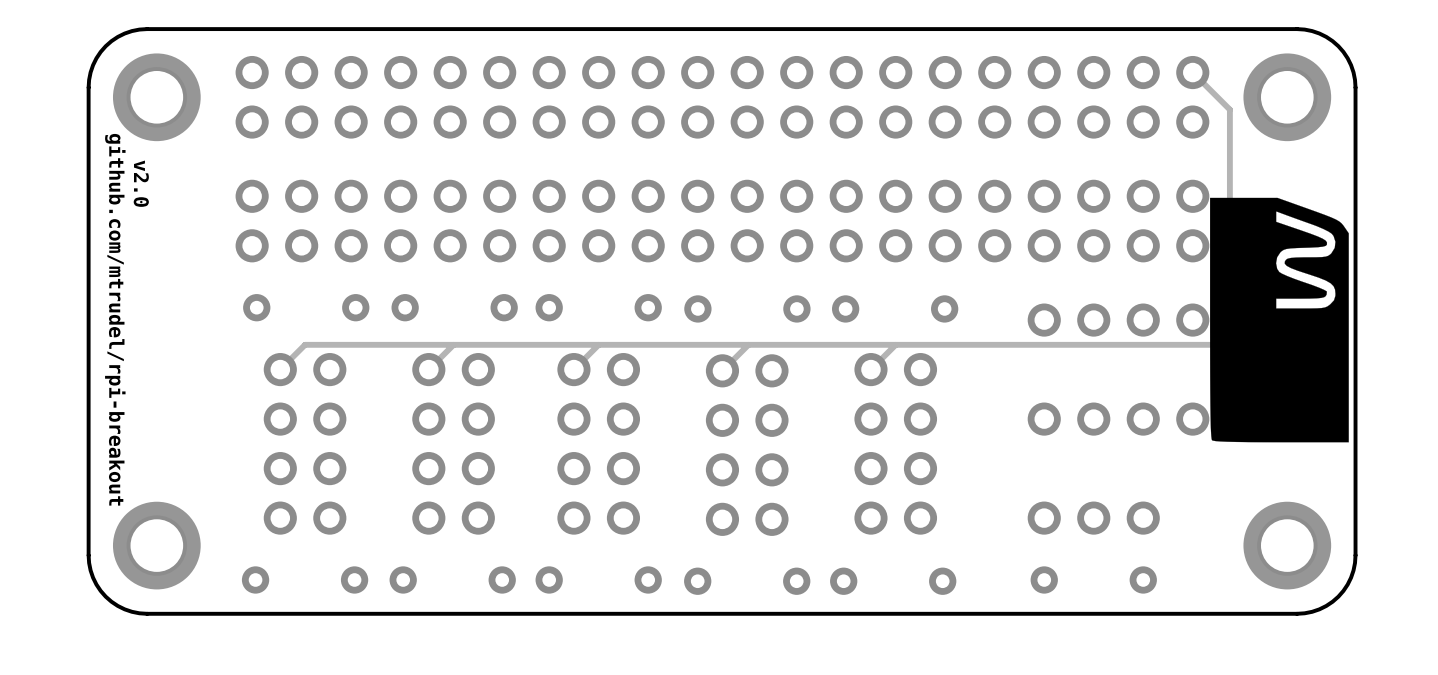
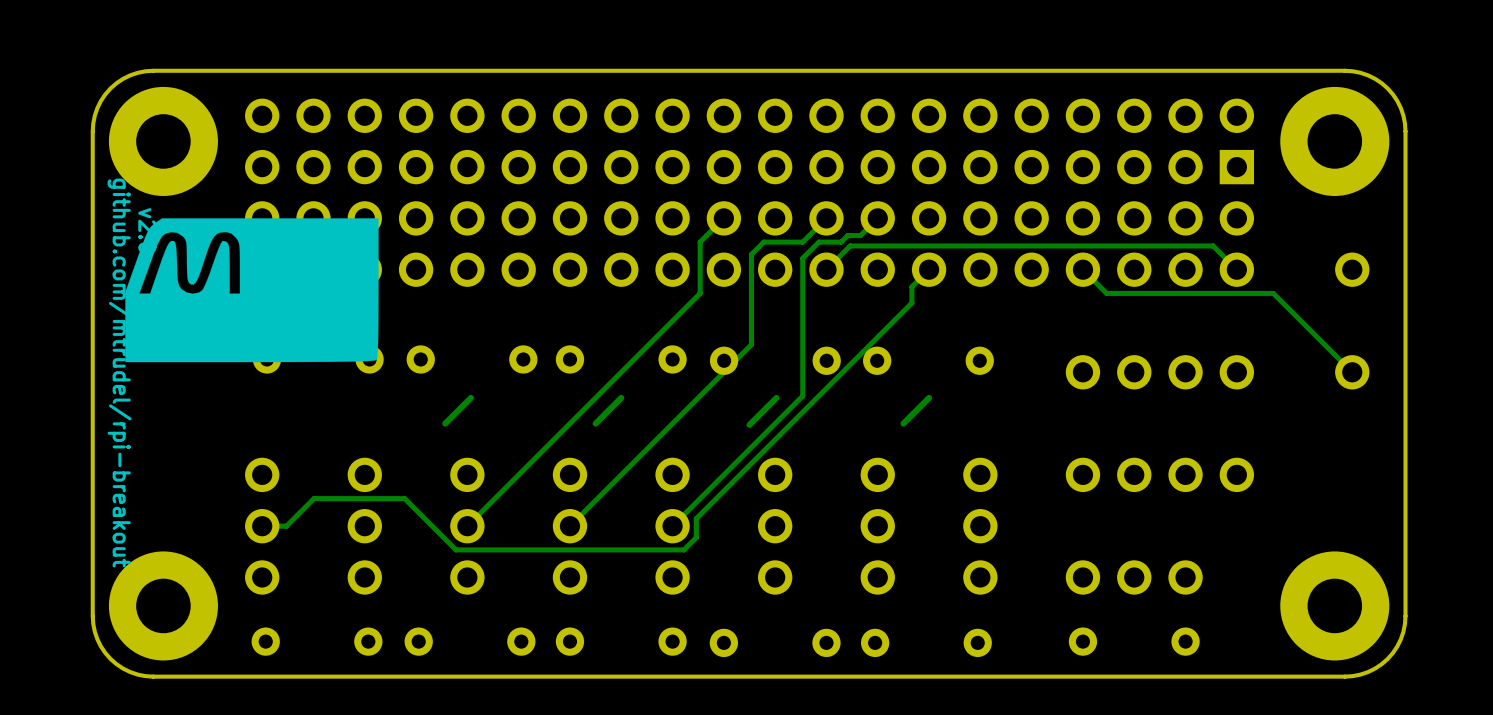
part footprint: [112, 53, 201, 142] -> [108, 86, 218, 196]
part footprint: [1243, 53, 1332, 142] -> [1280, 86, 1390, 196]
part footprint: [235, 55, 1210, 139] -> [245, 98, 1255, 185]
track: (1192, 72) (1229, 109) (1229, 332) (1217, 344) (305, 344) (280, 369) -> none
drawing: none -> [125, 218, 379, 363]
track: none -> (723, 218) (700, 242) (700, 293) (467, 526)
track: none -> (826, 218) (802, 242) (763, 242) (751, 254) (751, 344) (569, 526)
track: none -> (877, 218) (860, 235) (847, 235) (841, 242) (818, 242) (802, 258) (802, 396) (672, 526)
drawing: [1210, 197, 1349, 443] -> none
part position: (722, 221) -> (749, 244)
track: none -> (929, 269) (911, 286) (911, 303) (696, 518) (696, 537) (683, 549) (455, 549) (404, 498) (314, 498) (286, 526) (262, 526)
track: none -> (1082, 269) (1106, 293) (1273, 293) (1352, 372)
track: none -> (1236, 269) (1213, 245) (850, 245) (826, 269)
part: none -> (1352, 269)
part: none -> (1352, 372)
part: (305, 443) -> none
part: (453, 443) -> none
part: (598, 443) -> none
part: (895, 443) -> none
part: (747, 445) -> none
part: none -> (262, 526)
part: none -> (364, 526)
part: none -> (467, 526)
part: none -> (569, 526)
part: none -> (672, 526)
part: none -> (775, 526)
part: none -> (877, 526)
part: none -> (980, 526)
part footprint: [112, 501, 201, 590] -> [108, 551, 218, 661]
part footprint: [1243, 501, 1332, 590] -> [1280, 551, 1390, 661]

